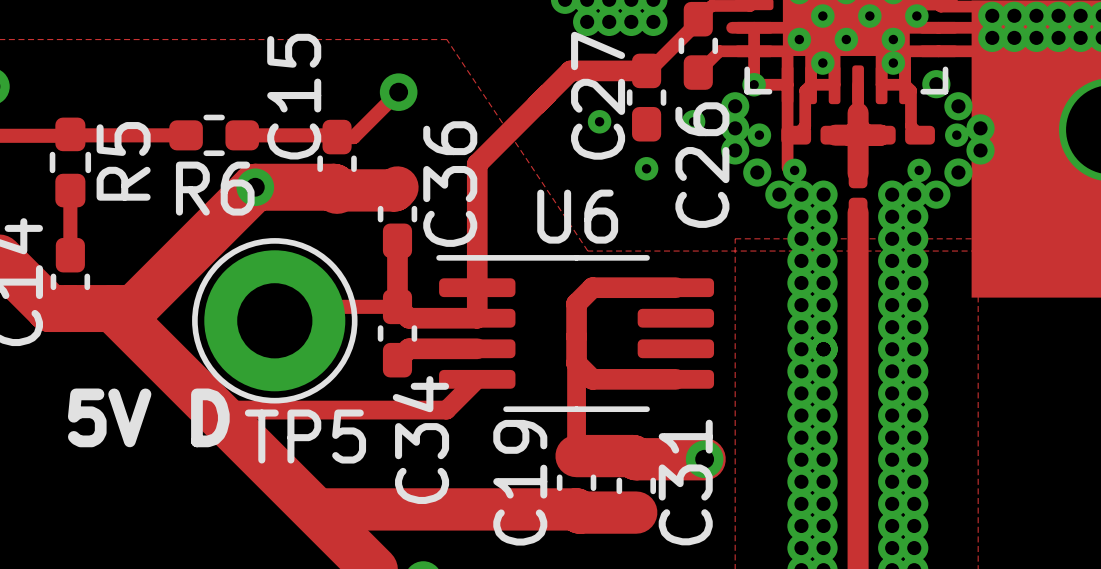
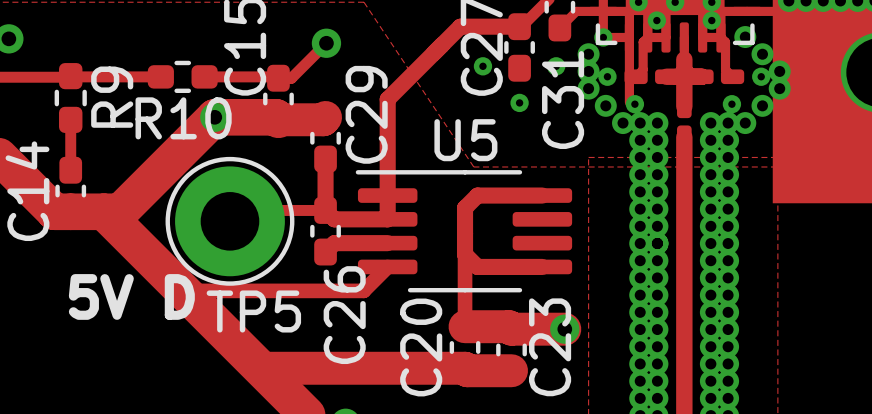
R5 name: R5 (123, 161) -> R9 (112, 97)
C26 name: C26 (702, 165) -> C31 (563, 100)
C36 name: C36 (450, 184) -> C29 (366, 114)
R6 name: R6 (215, 188) -> R10 (183, 118)
U6 name: U6 (577, 216) -> U5 (465, 140)
C34 name: C34 (420, 440) -> C26 (344, 315)
C19 name: C19 (520, 482) -> C20 (421, 347)
C31 name: C31 (685, 482) -> C23 (550, 347)

